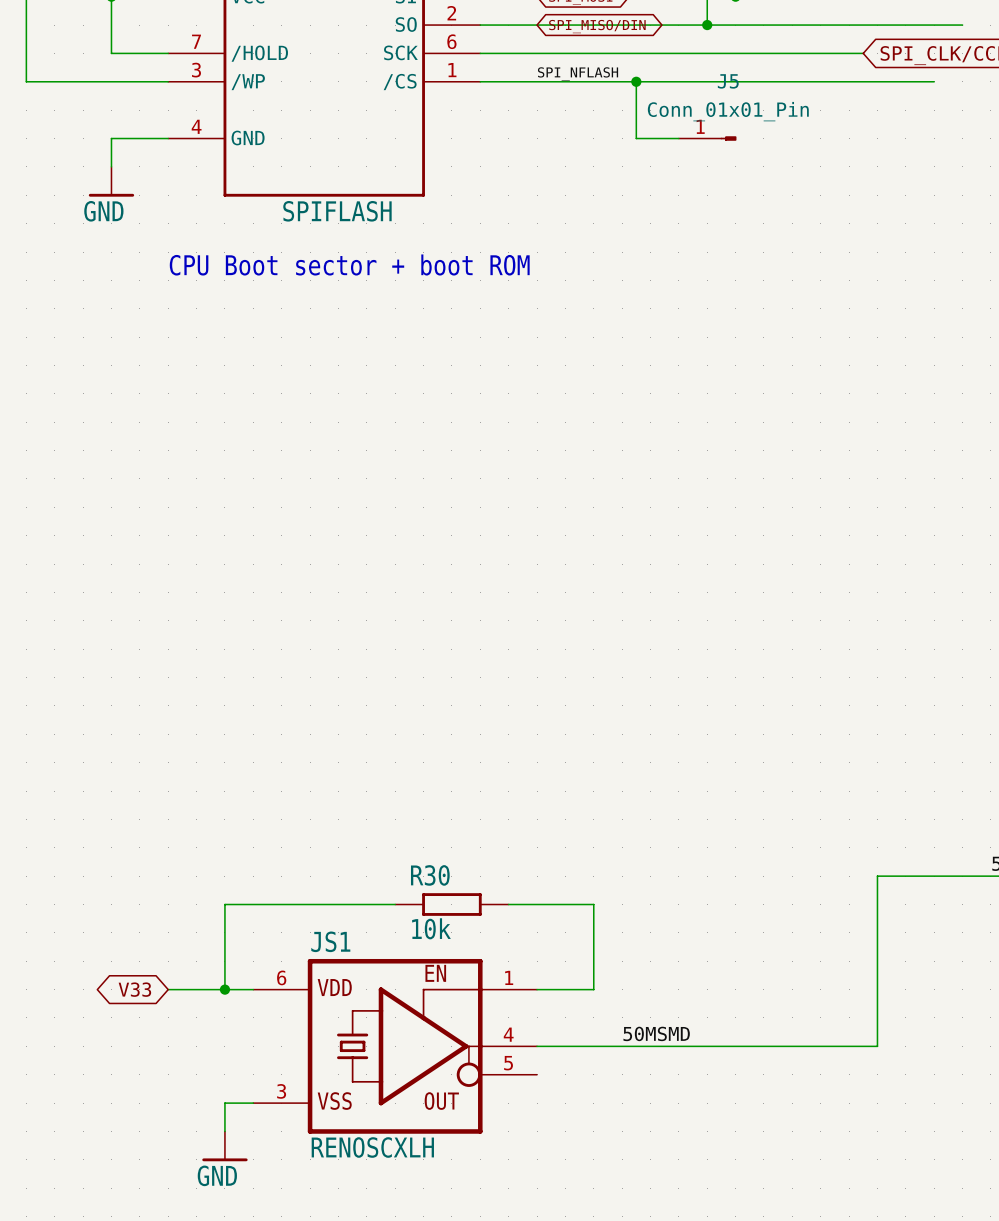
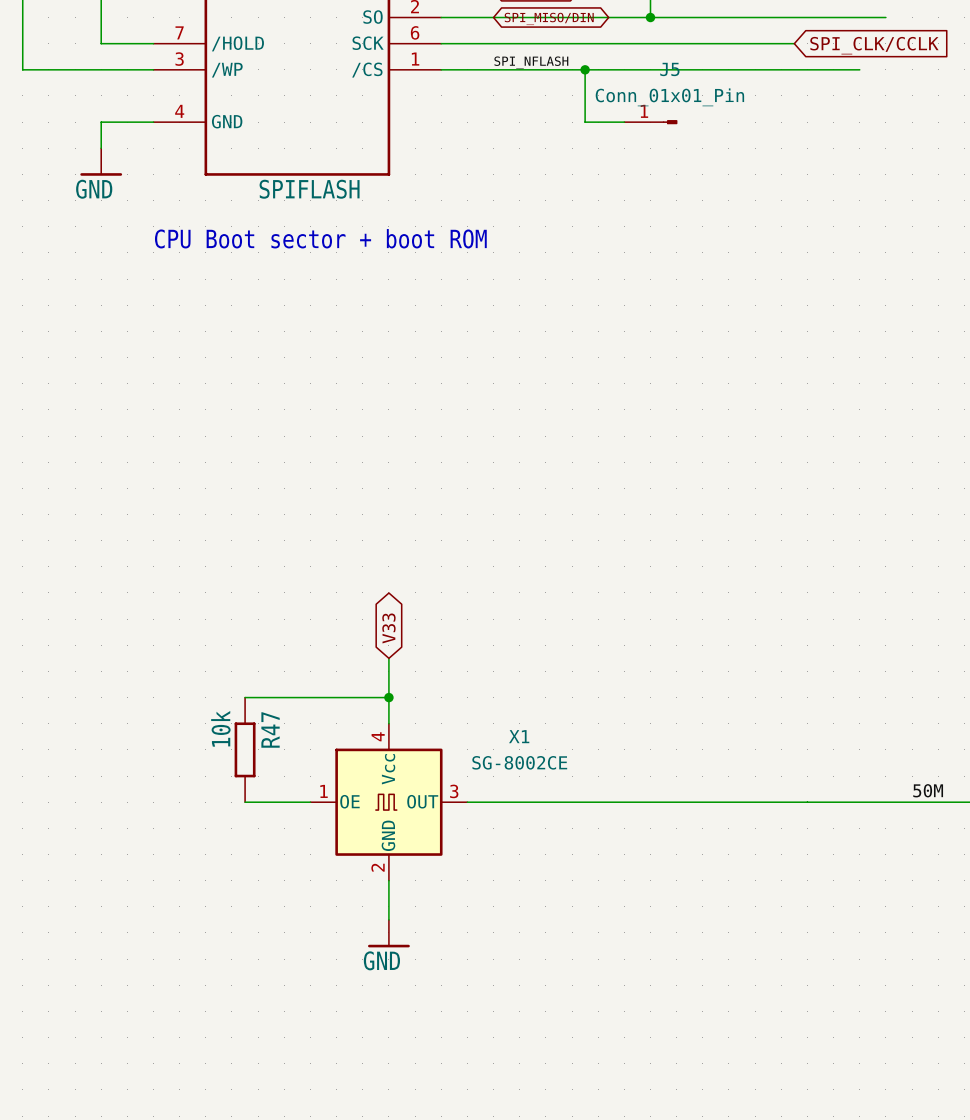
global label: none -> V33 (388, 628)
wire: none -> (388, 658) (388, 723)
wire: none -> (245, 697) (388, 697)
junction: none -> (388, 697)
R47: none -> 10k (245, 749)
wire: none -> (245, 802) (310, 802)
X1: none -> SG-8002CE (388, 802)
wire: (877, 876) (877, 1046) (537, 1046) -> (807, 802) (467, 802)
wire: (395, 904) (224, 904) (224, 989) -> none
R30: 10k (451, 904) -> none
wire: (508, 904) (593, 904) (593, 989) (537, 989) -> none
wire: none -> (388, 880) (388, 919)
global label: V33 (134, 989) -> none
wire: (168, 989) (253, 989) -> none
junction: (224, 989) -> none
label: 50MSMD (656, 1033) -> none
JS1: RENOSCXLH (395, 1046) -> none
wire: (253, 1103) (224, 1103) (224, 1131) -> none
power symbol position: GND (224, 1146) -> GND (388, 933)

